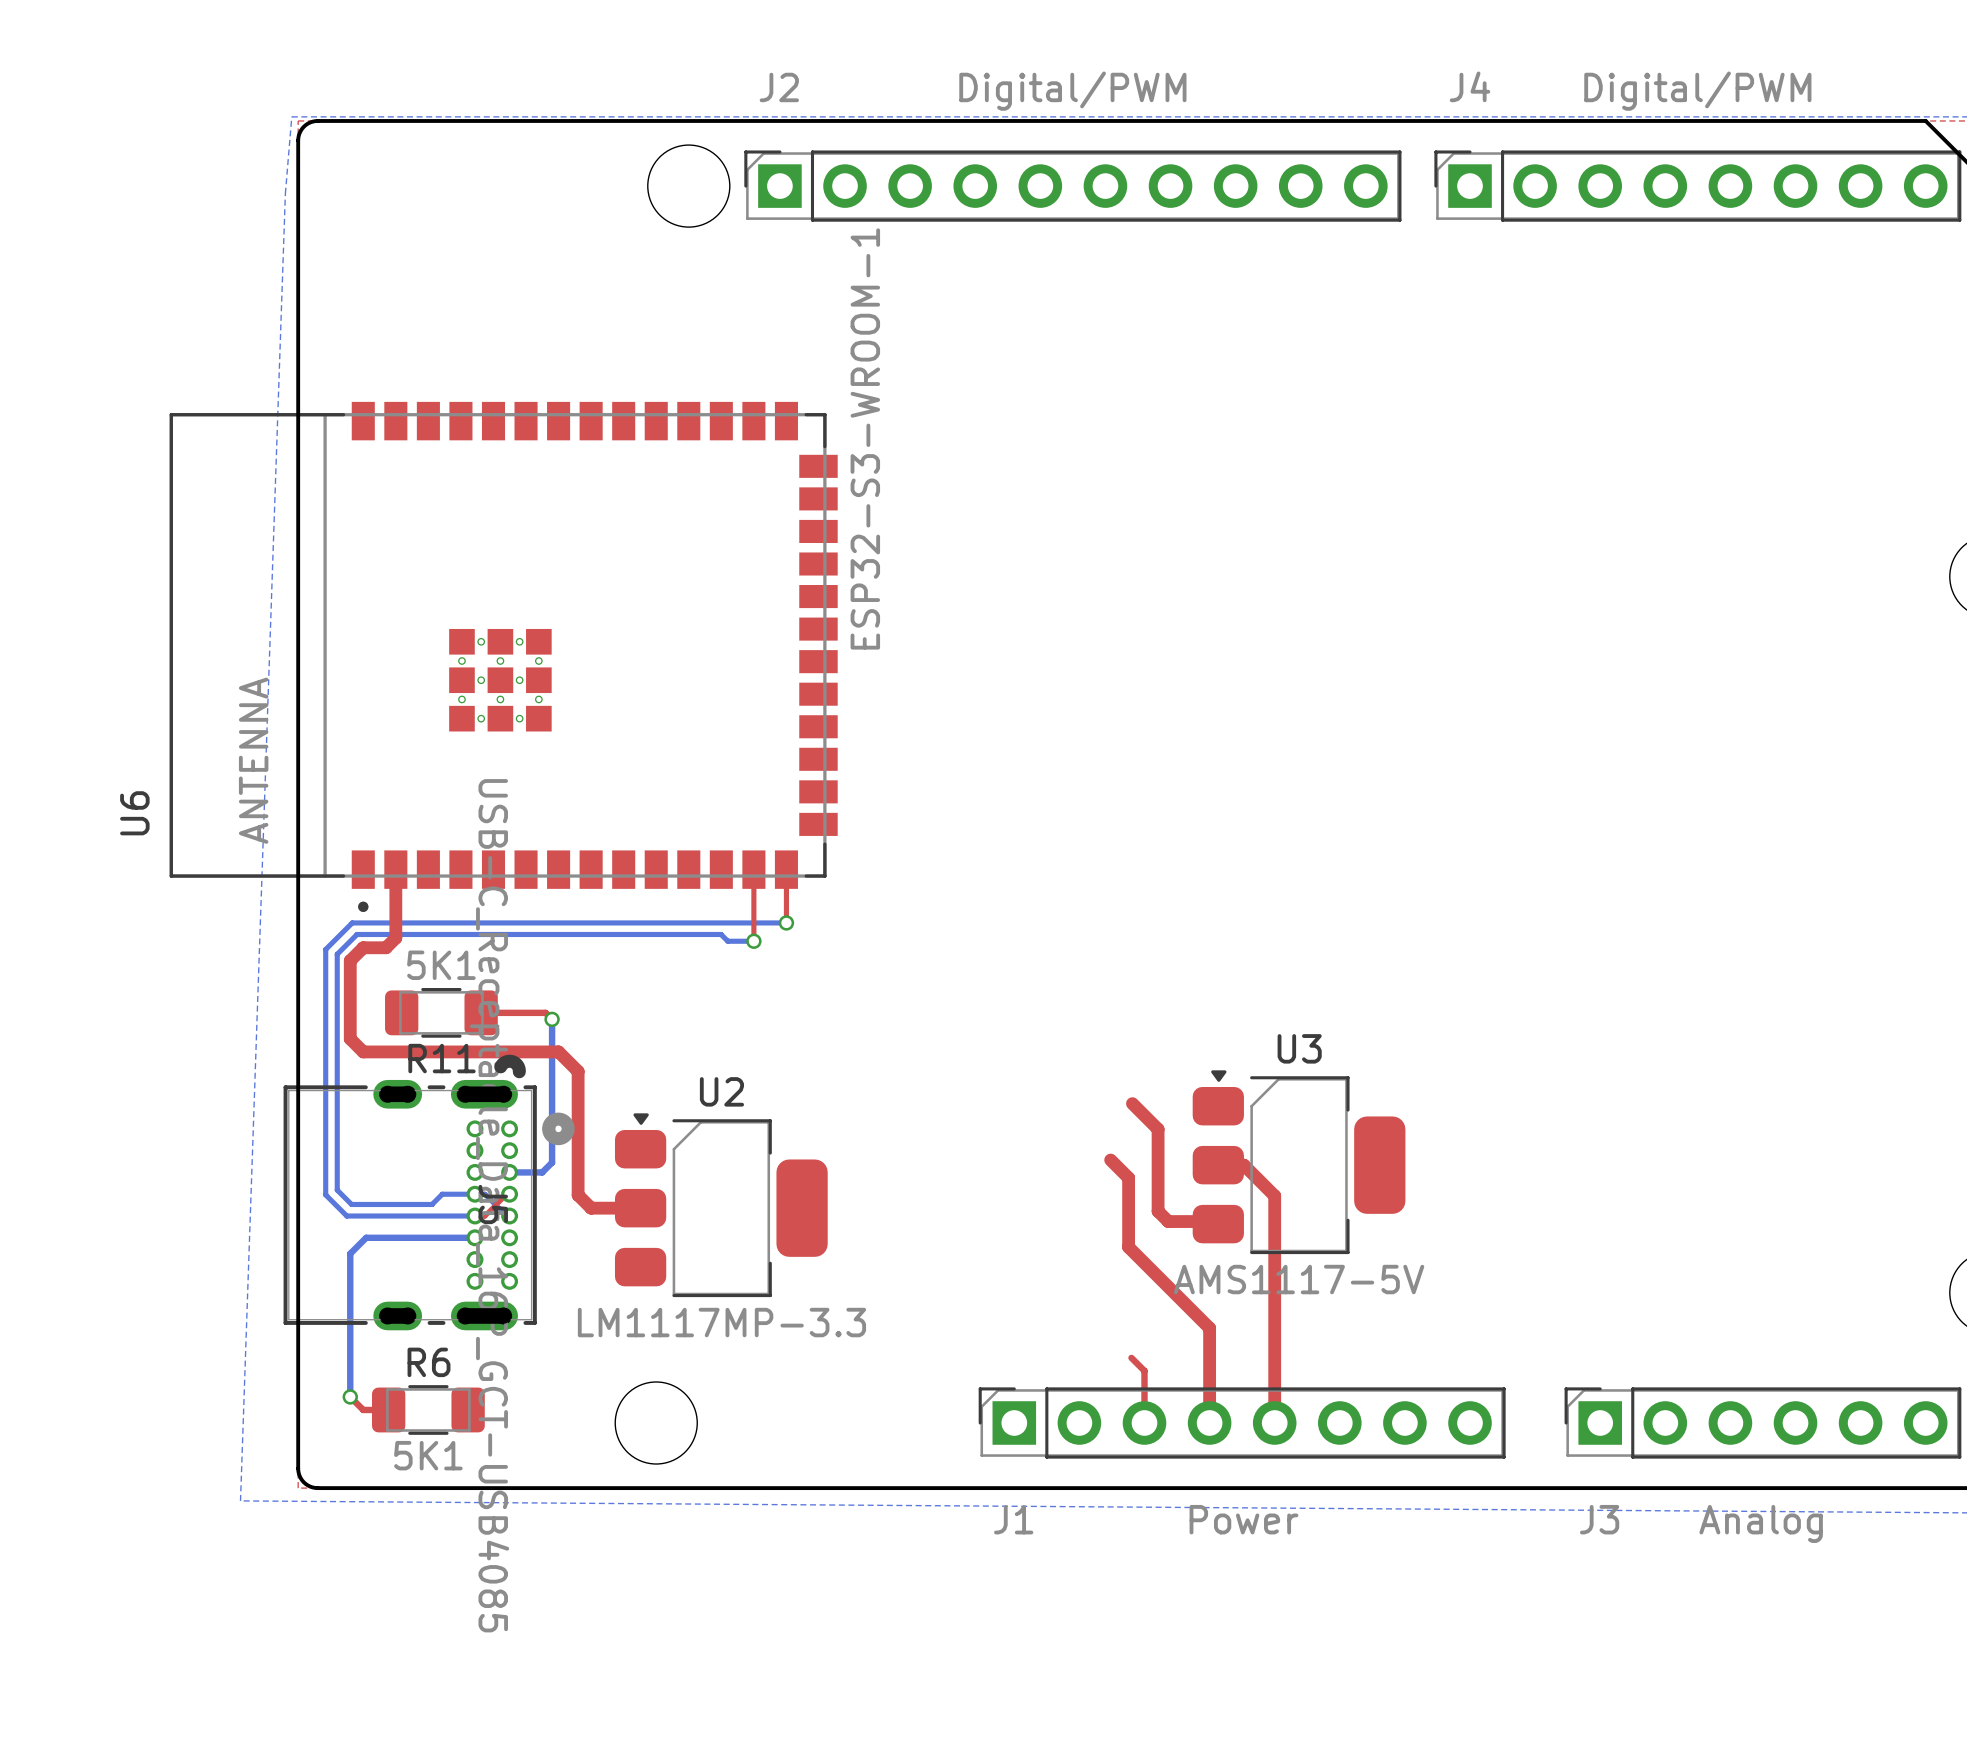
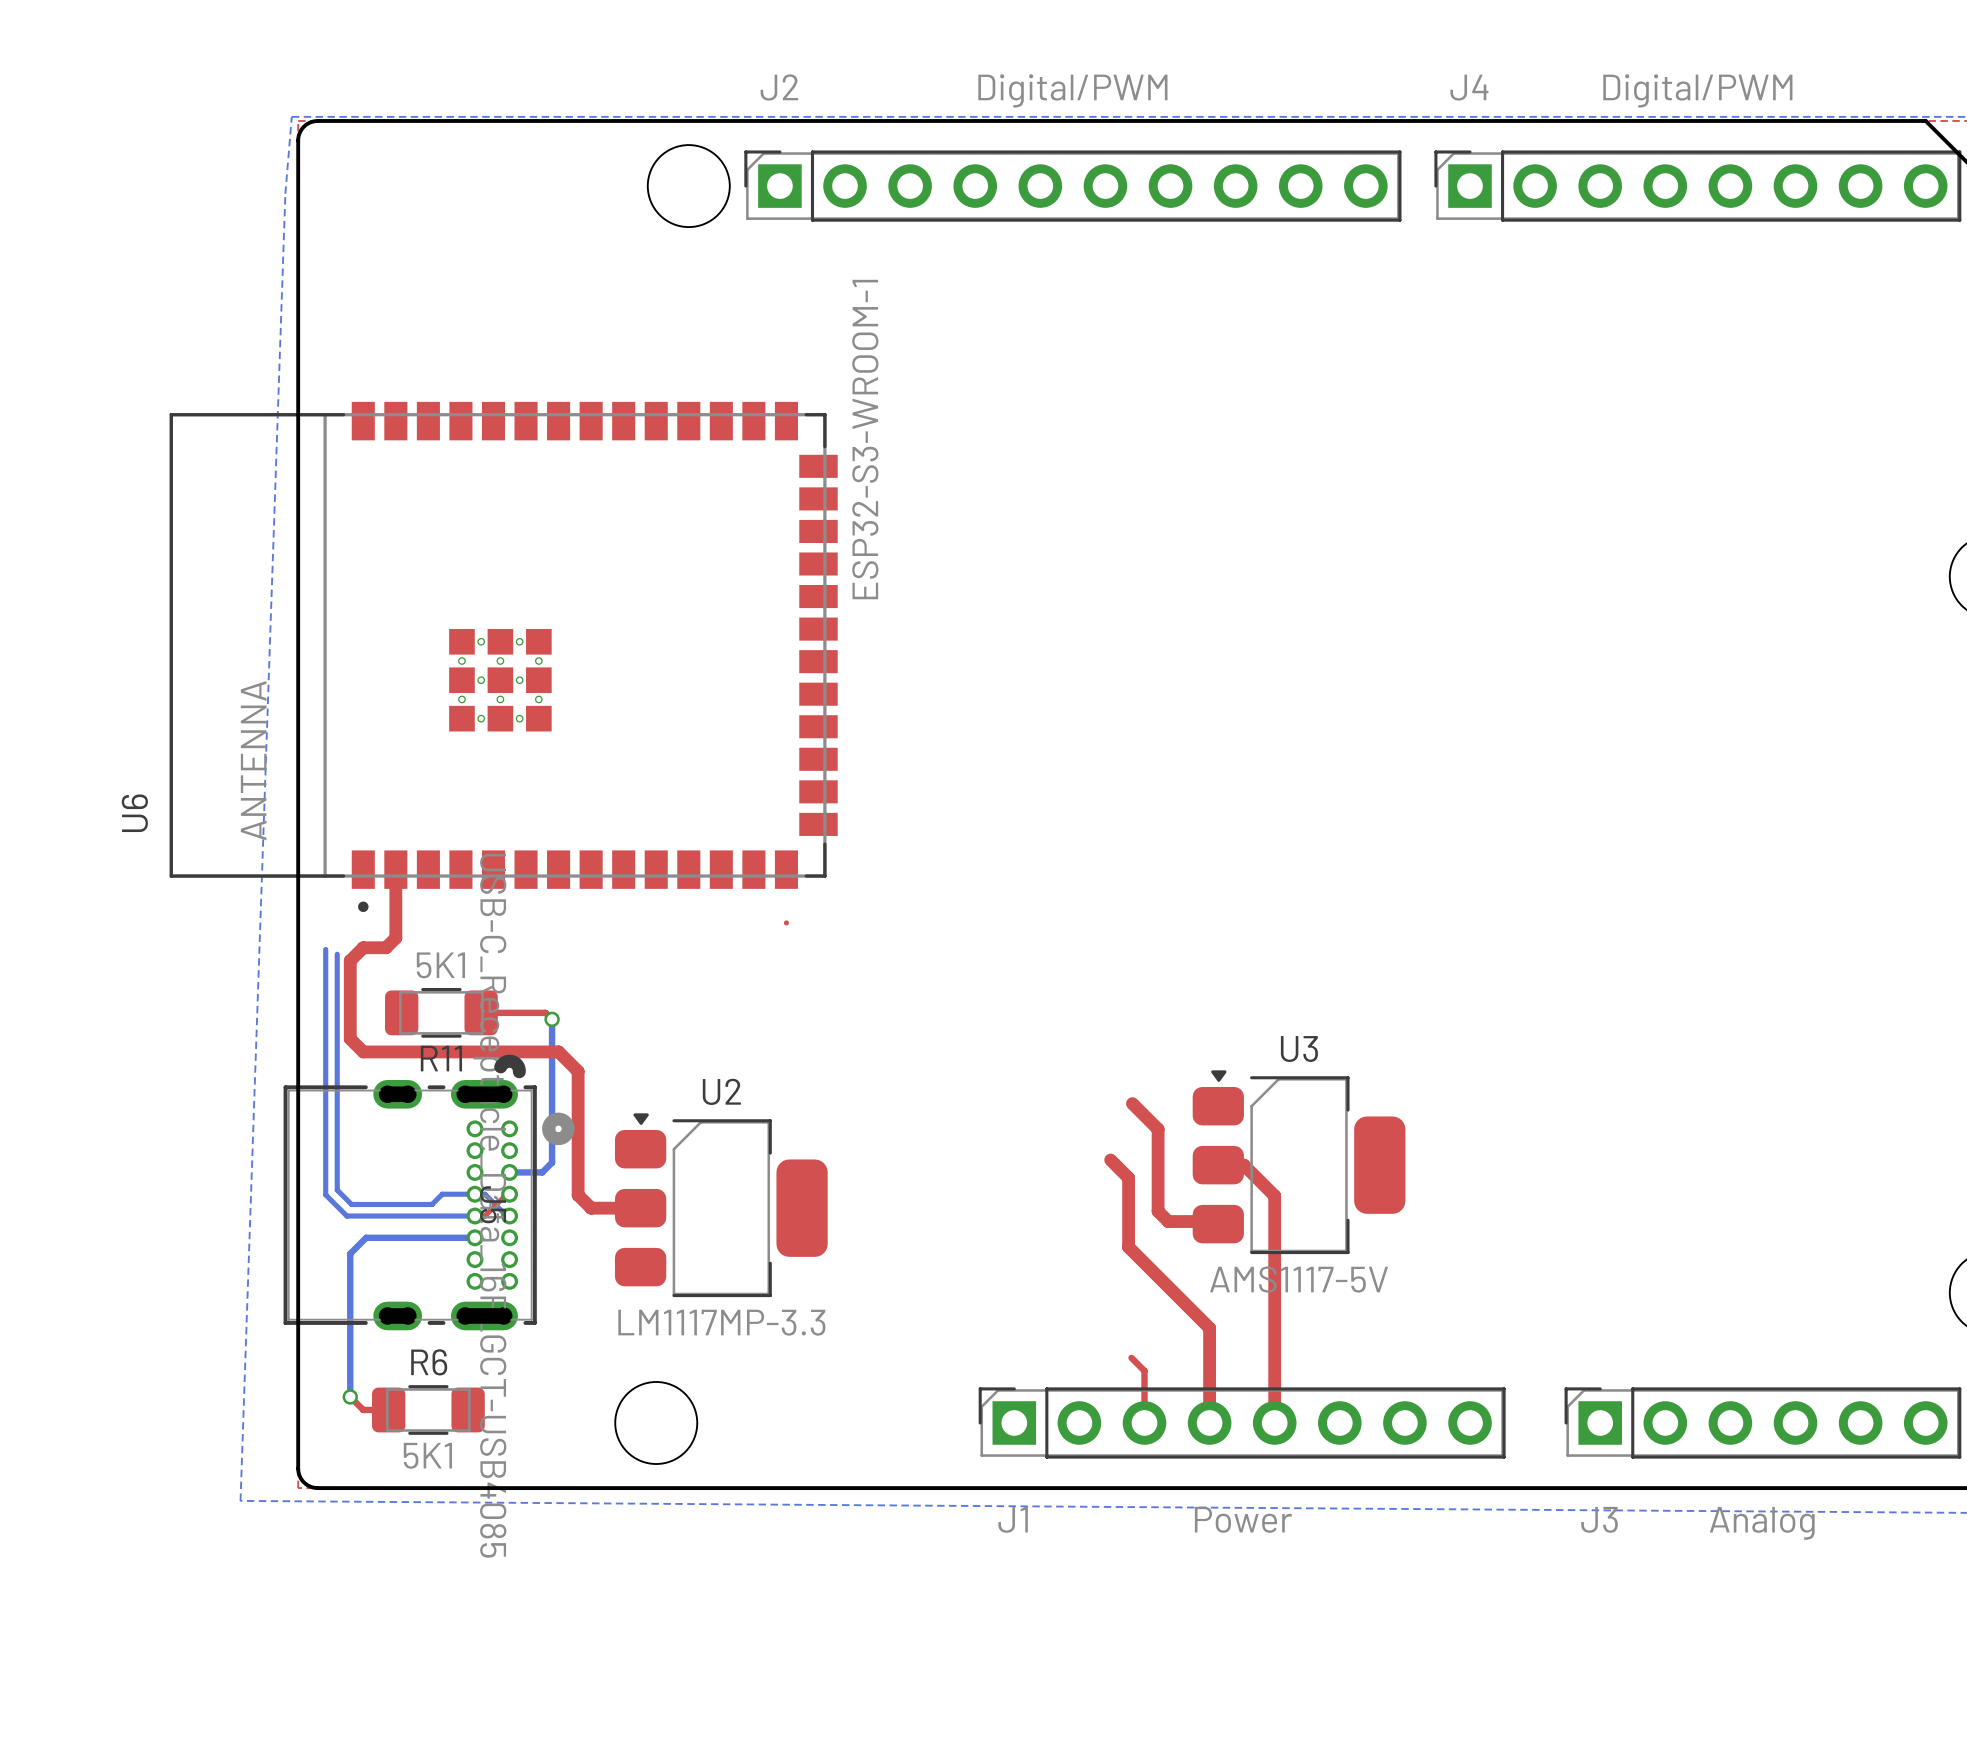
top track: (753, 869) (753, 941) -> none
top track: (786, 869) (786, 922) -> none
bottom track: (786, 922) (352, 922) (325, 949) -> none
via: (786, 922) -> none
bottom track: (753, 941) (727, 941) (721, 934) (357, 934) (337, 954) -> none
via: (753, 941) -> none

